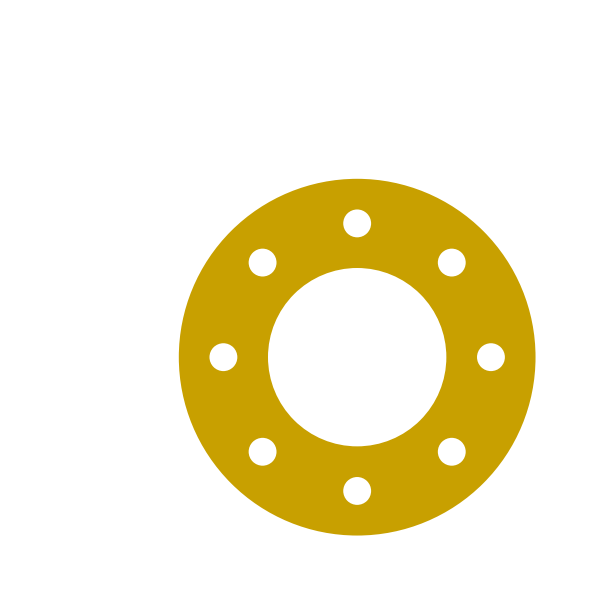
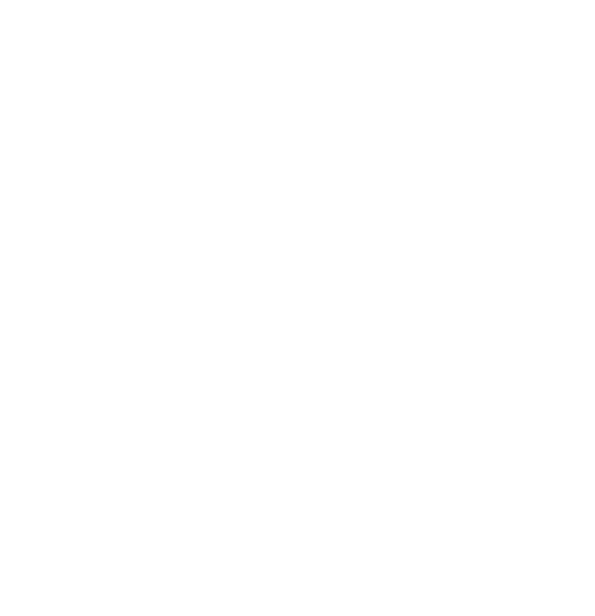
part: (357, 357) -> none

